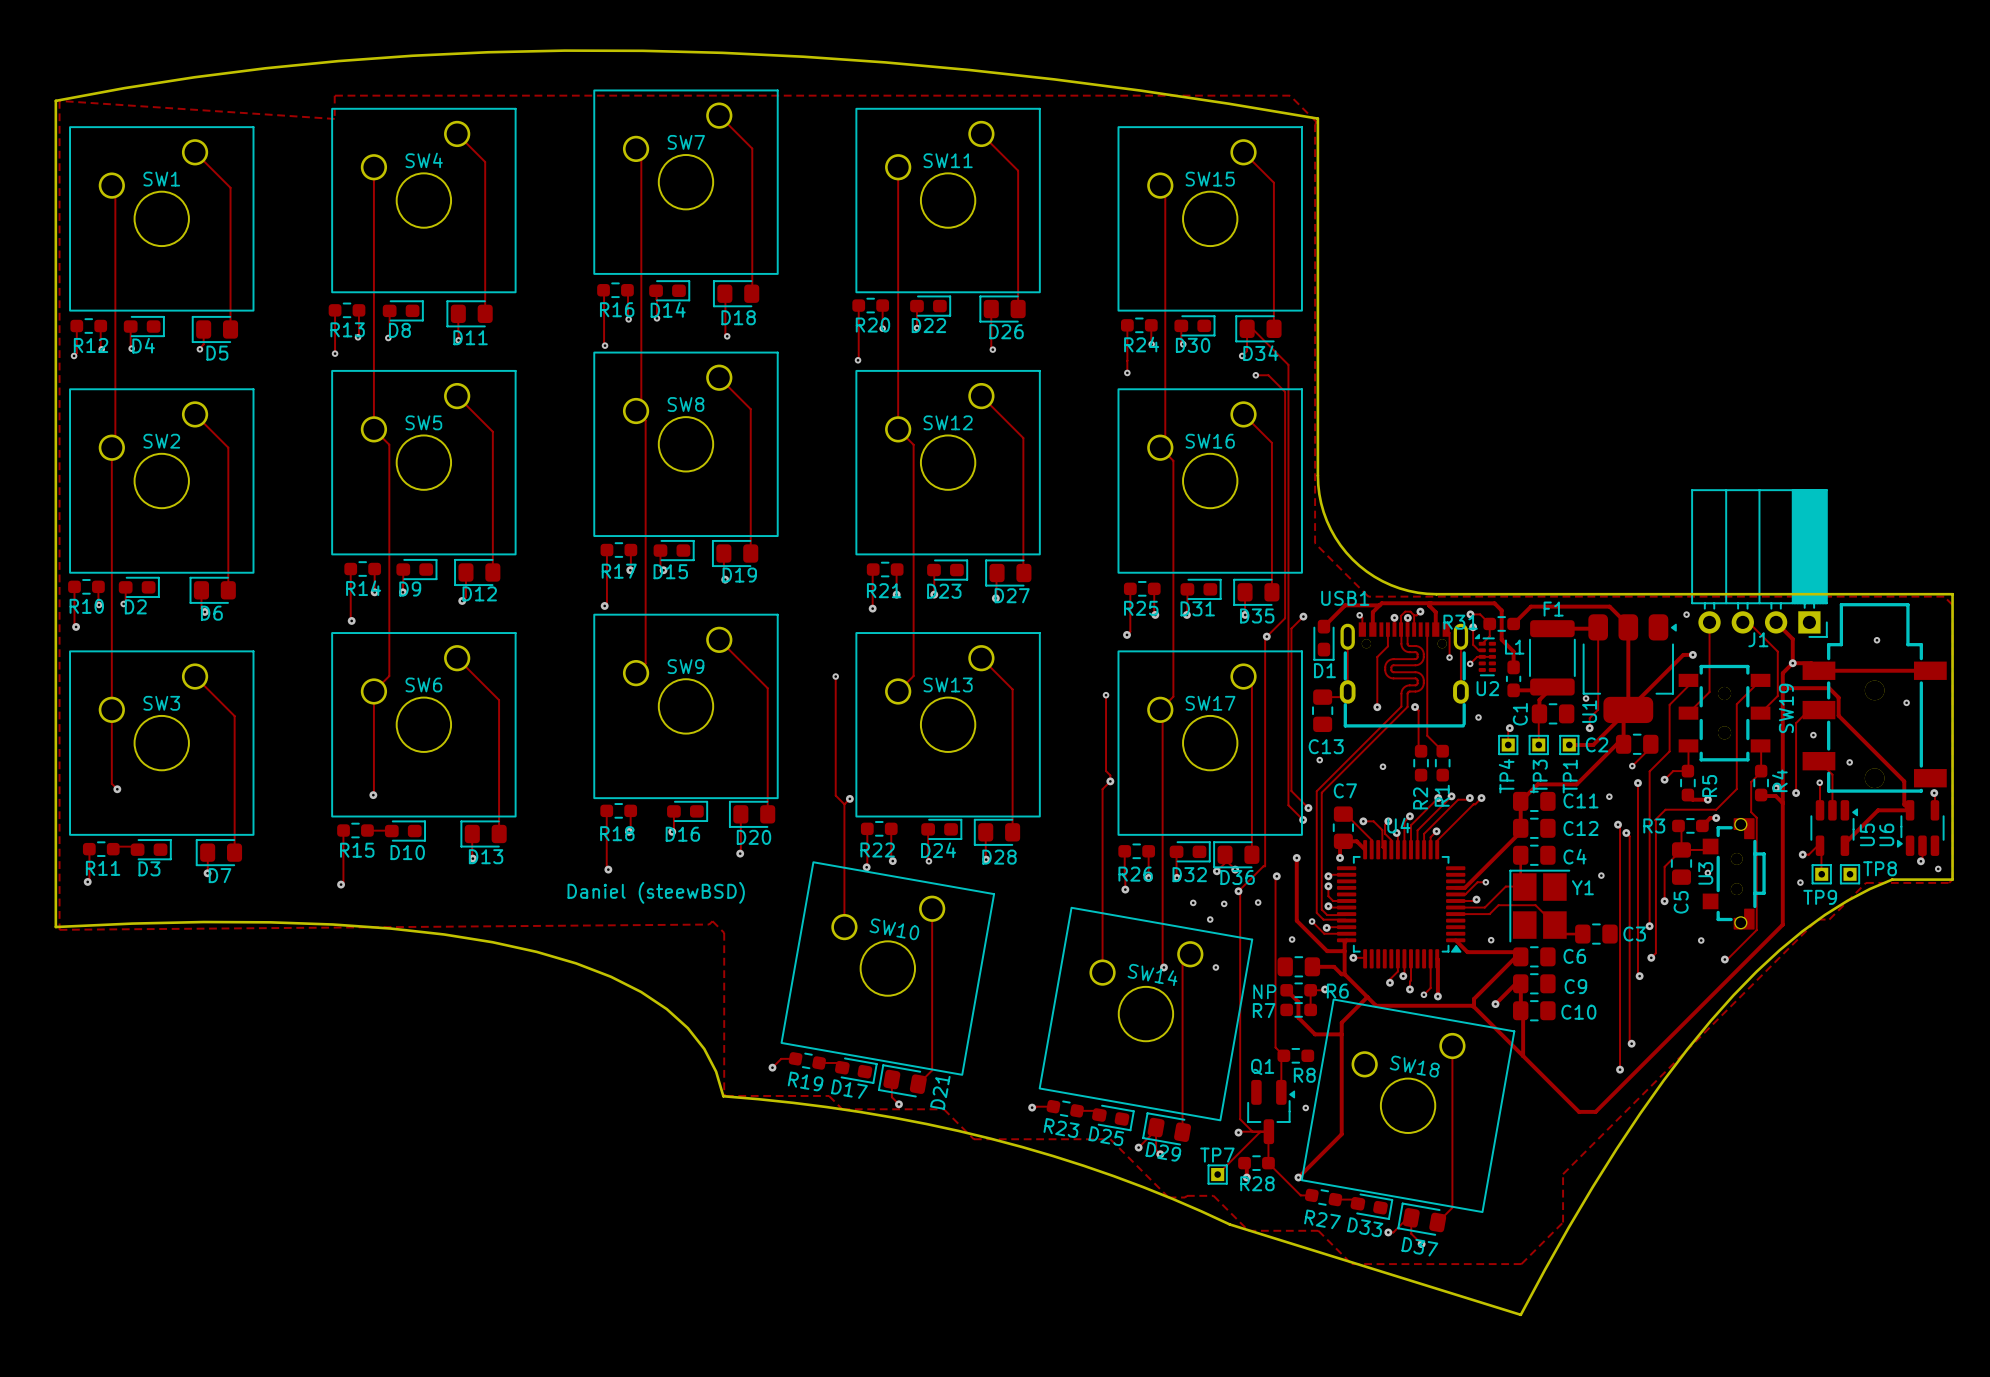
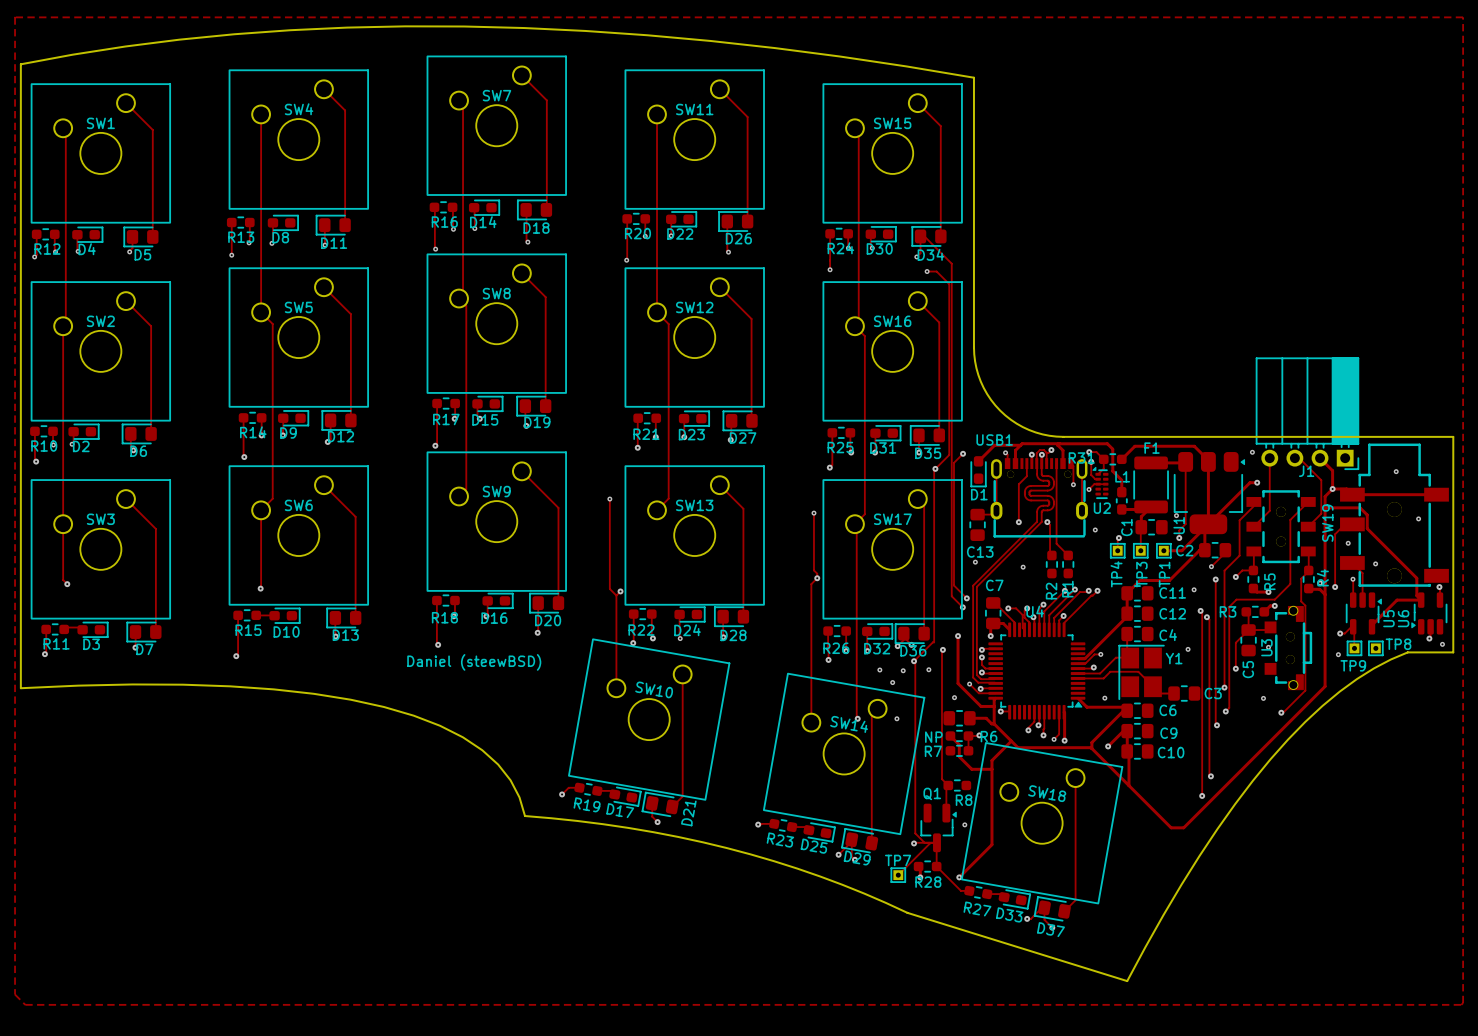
zone outline: (334, 95) (1290, 95) (1316, 122) (1315, 123) (1315, 543) (1368, 596) (1944, 596) (1952, 604) (1952, 879) (1949, 882) (1866, 882) (1829, 919) (1817, 919) (1563, 1174) (1563, 1222) (1521, 1264) (1351, 1264) (1318, 1230) (1248, 1230) (1213, 1195) (1168, 1197) (1110, 1139) (973, 1139) (943, 1109) (842, 1109) (829, 1095) (725, 1095) (724, 1094) (724, 932) (712, 921) (709, 924) (59, 929) (59, 100) (334, 118) (334, 95) -> (15, 17) (15, 994) (25, 1004) (1461, 1004) (1463, 1003) (1463, 17) (15, 17)

